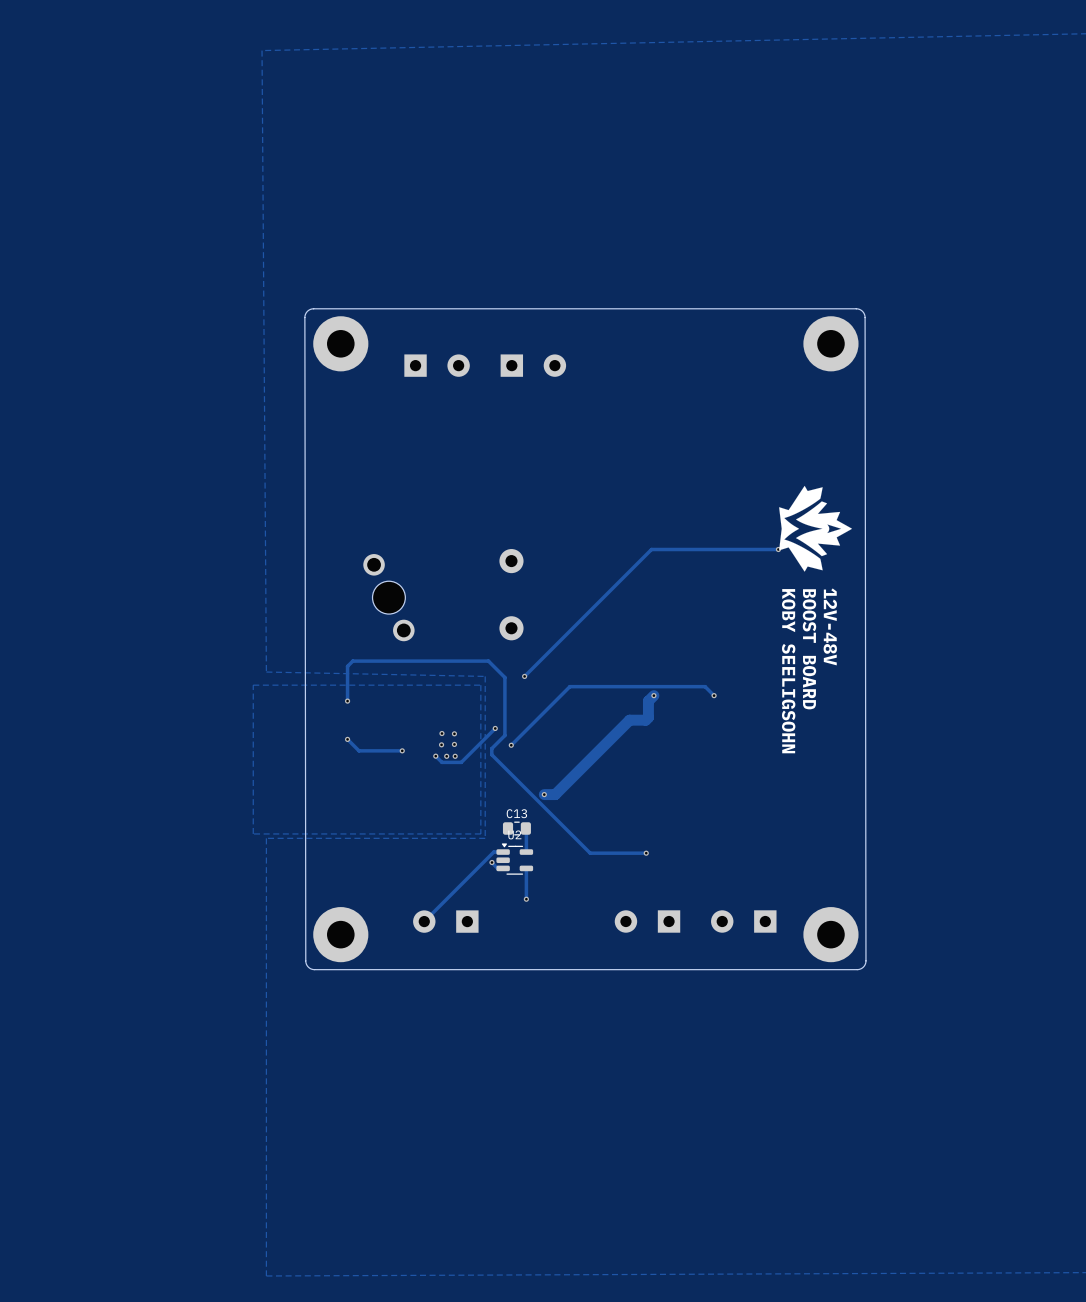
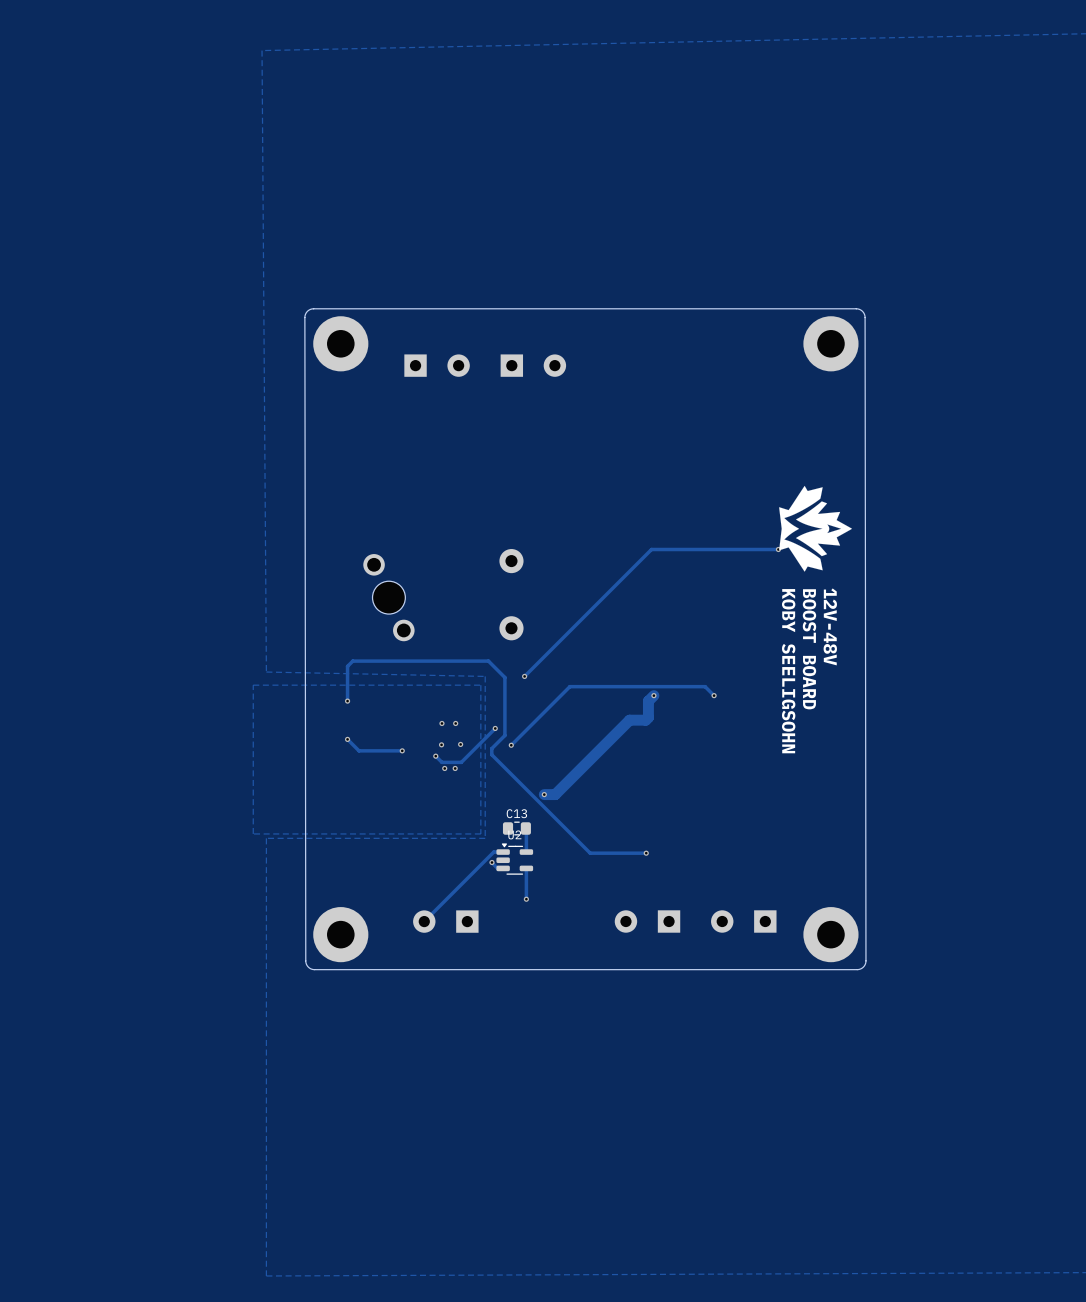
via: none -> (441, 723)
via: none -> (455, 723)
via: (441, 733) -> none
via: (454, 733) -> none
via: (454, 744) -> none
via: none -> (460, 744)
via: (446, 756) -> none
via: (455, 756) -> none
via: none -> (444, 768)
via: none -> (455, 768)

